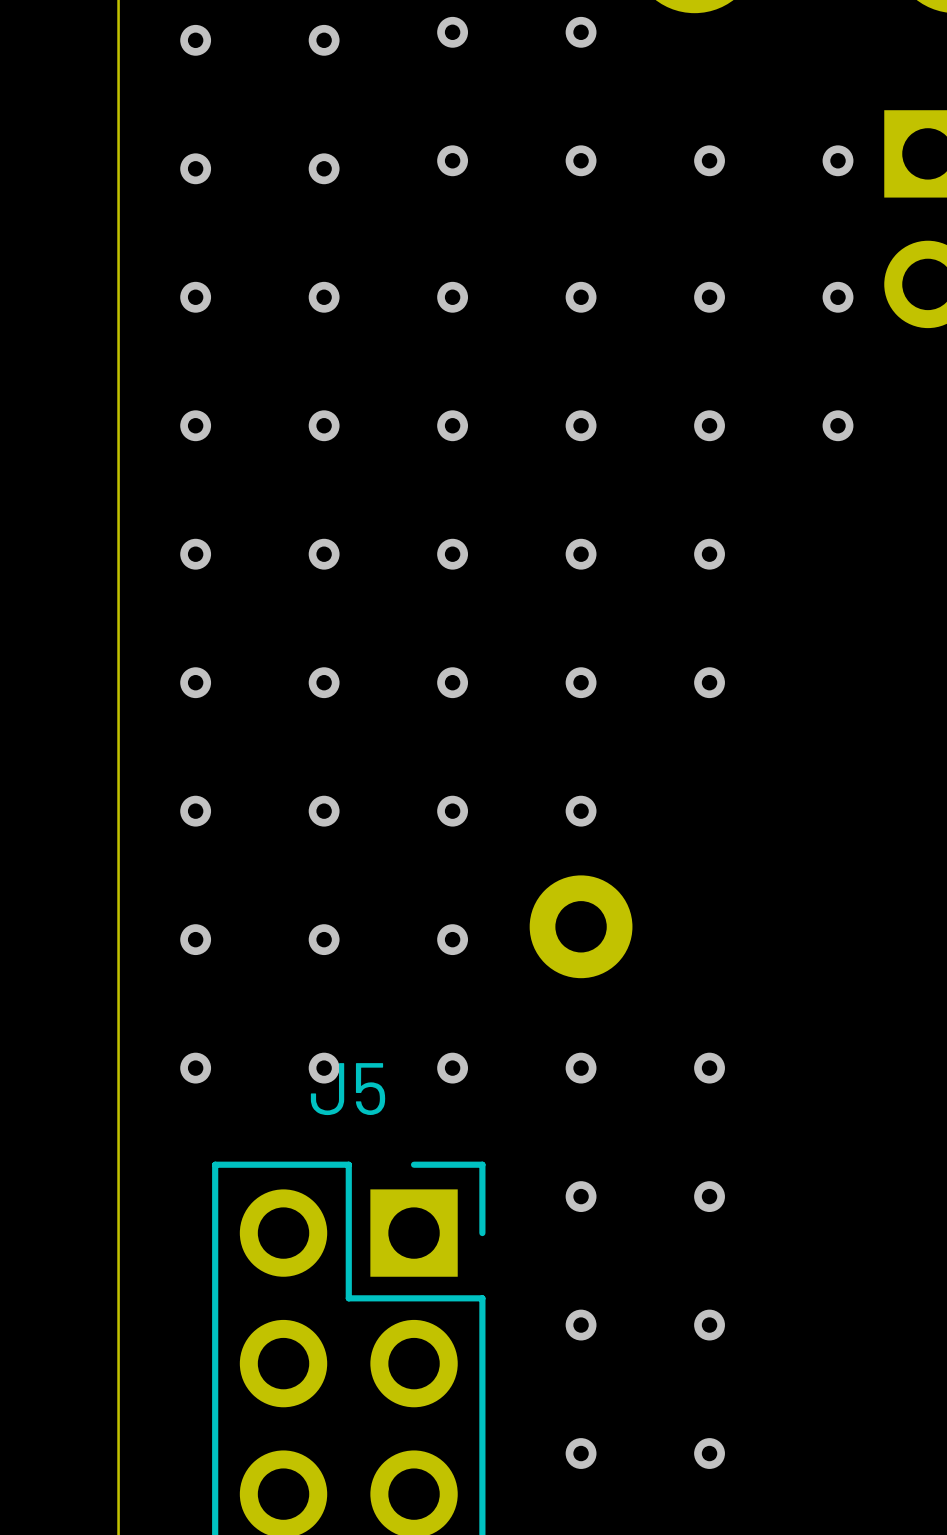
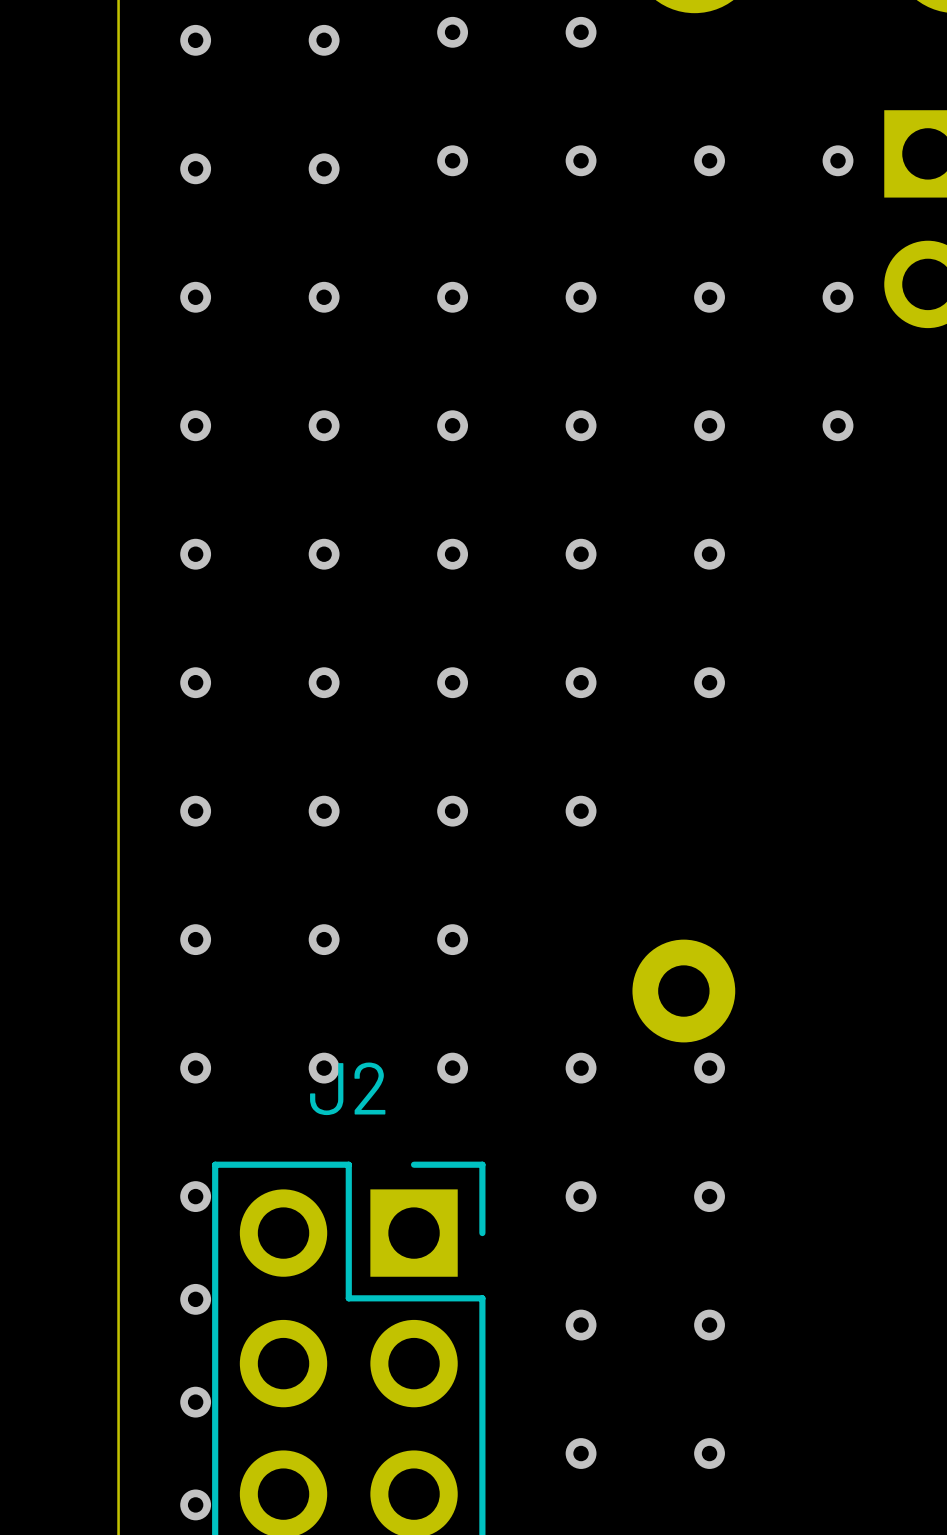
part position: (581, 926) -> (683, 991)
J5 name: J5 (348, 1089) -> J2 (347, 1088)
via: none -> (195, 1196)
via: none -> (195, 1299)
via: none -> (195, 1402)
via: none -> (195, 1504)

